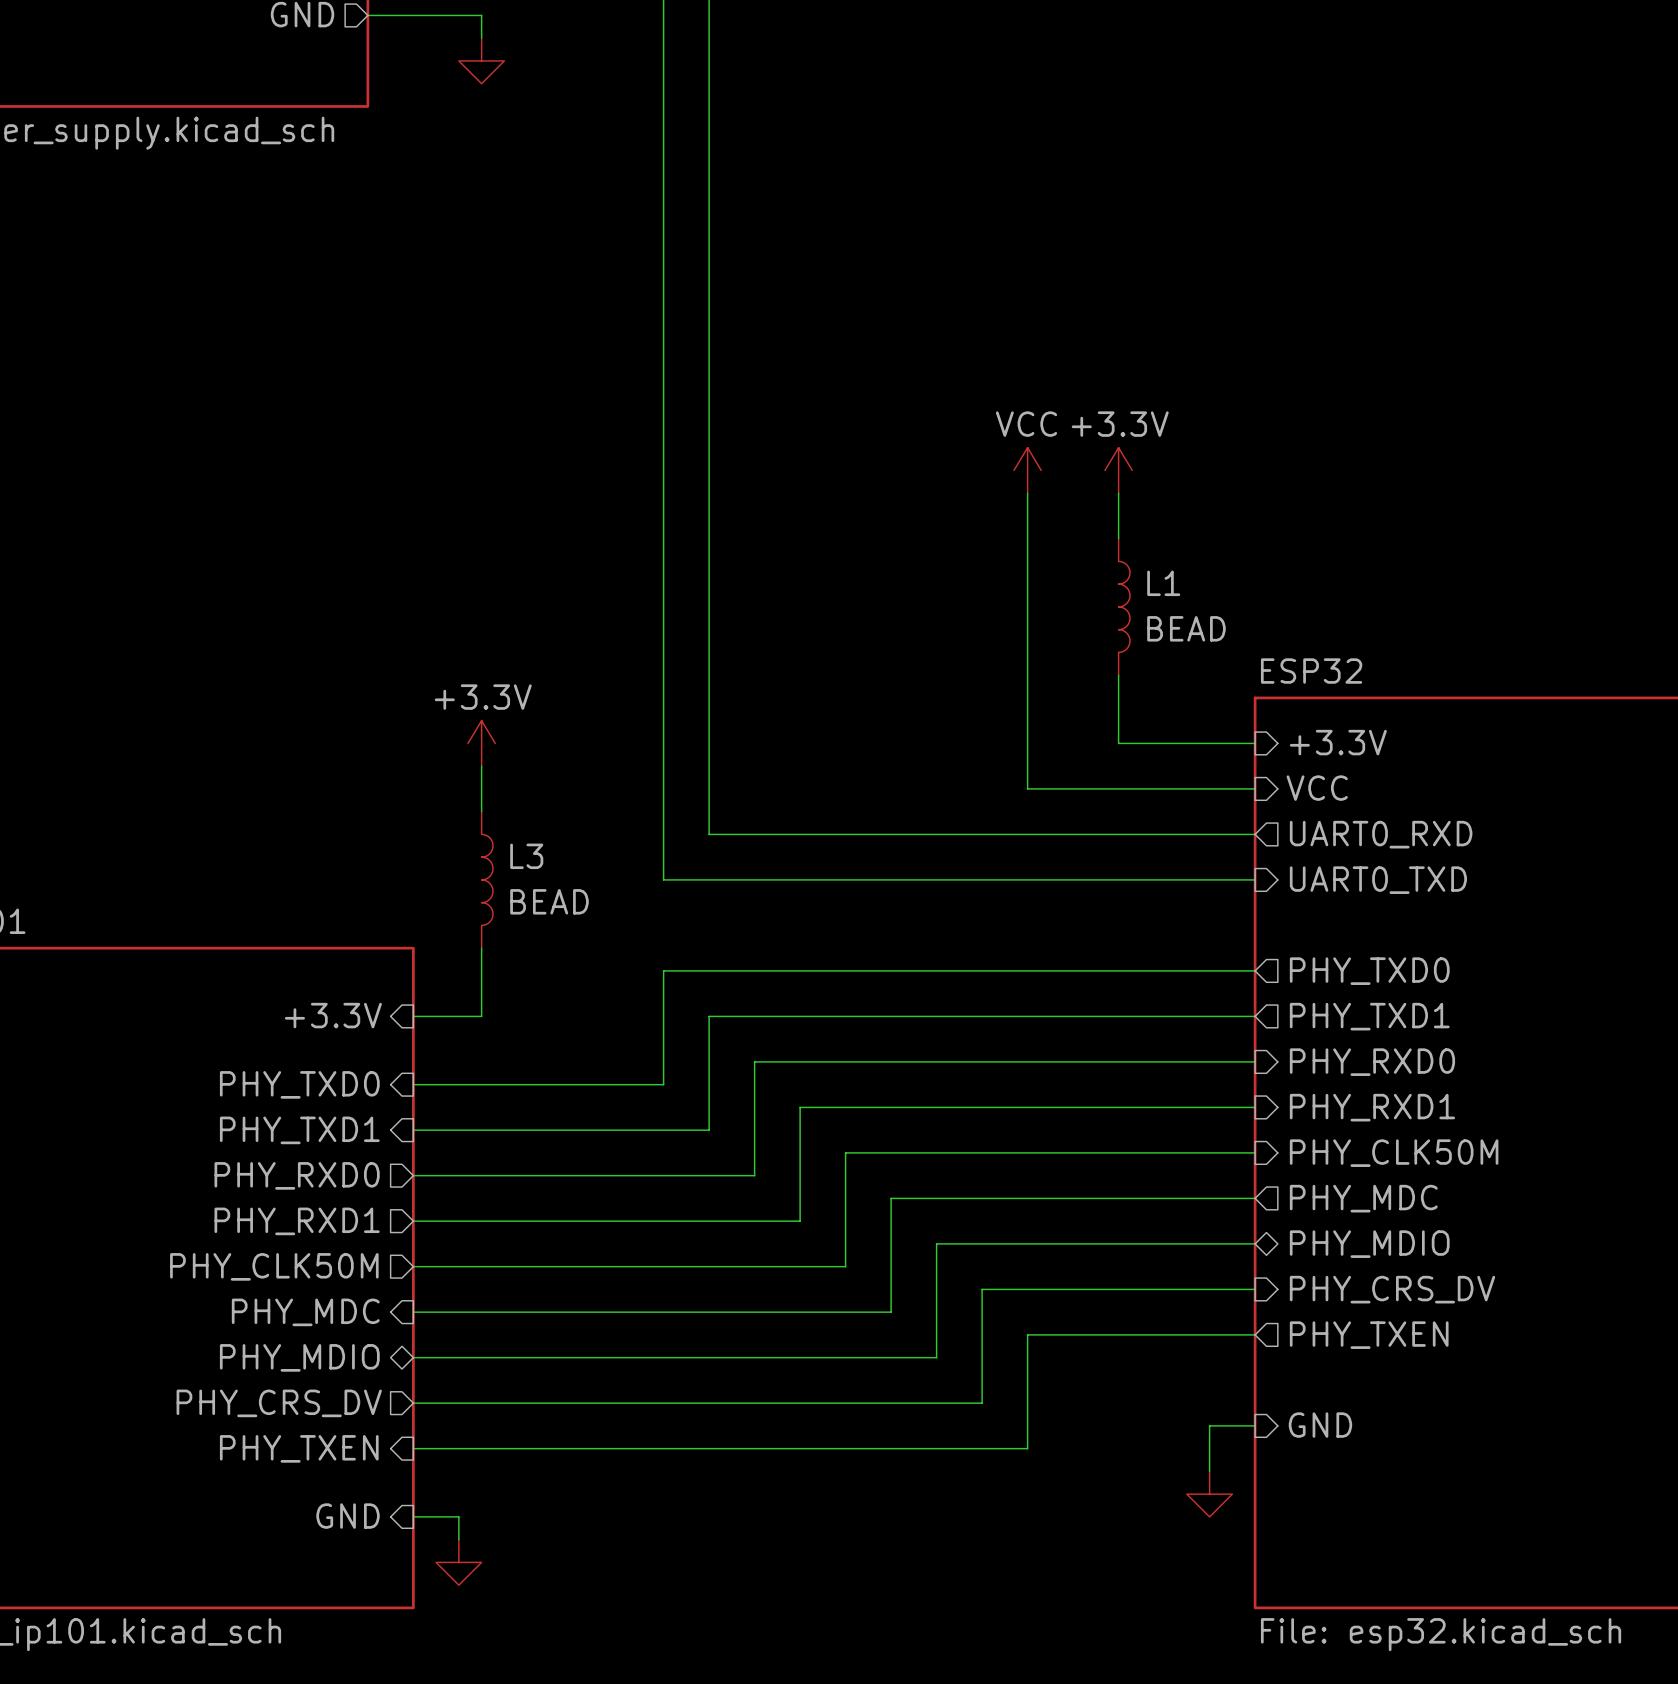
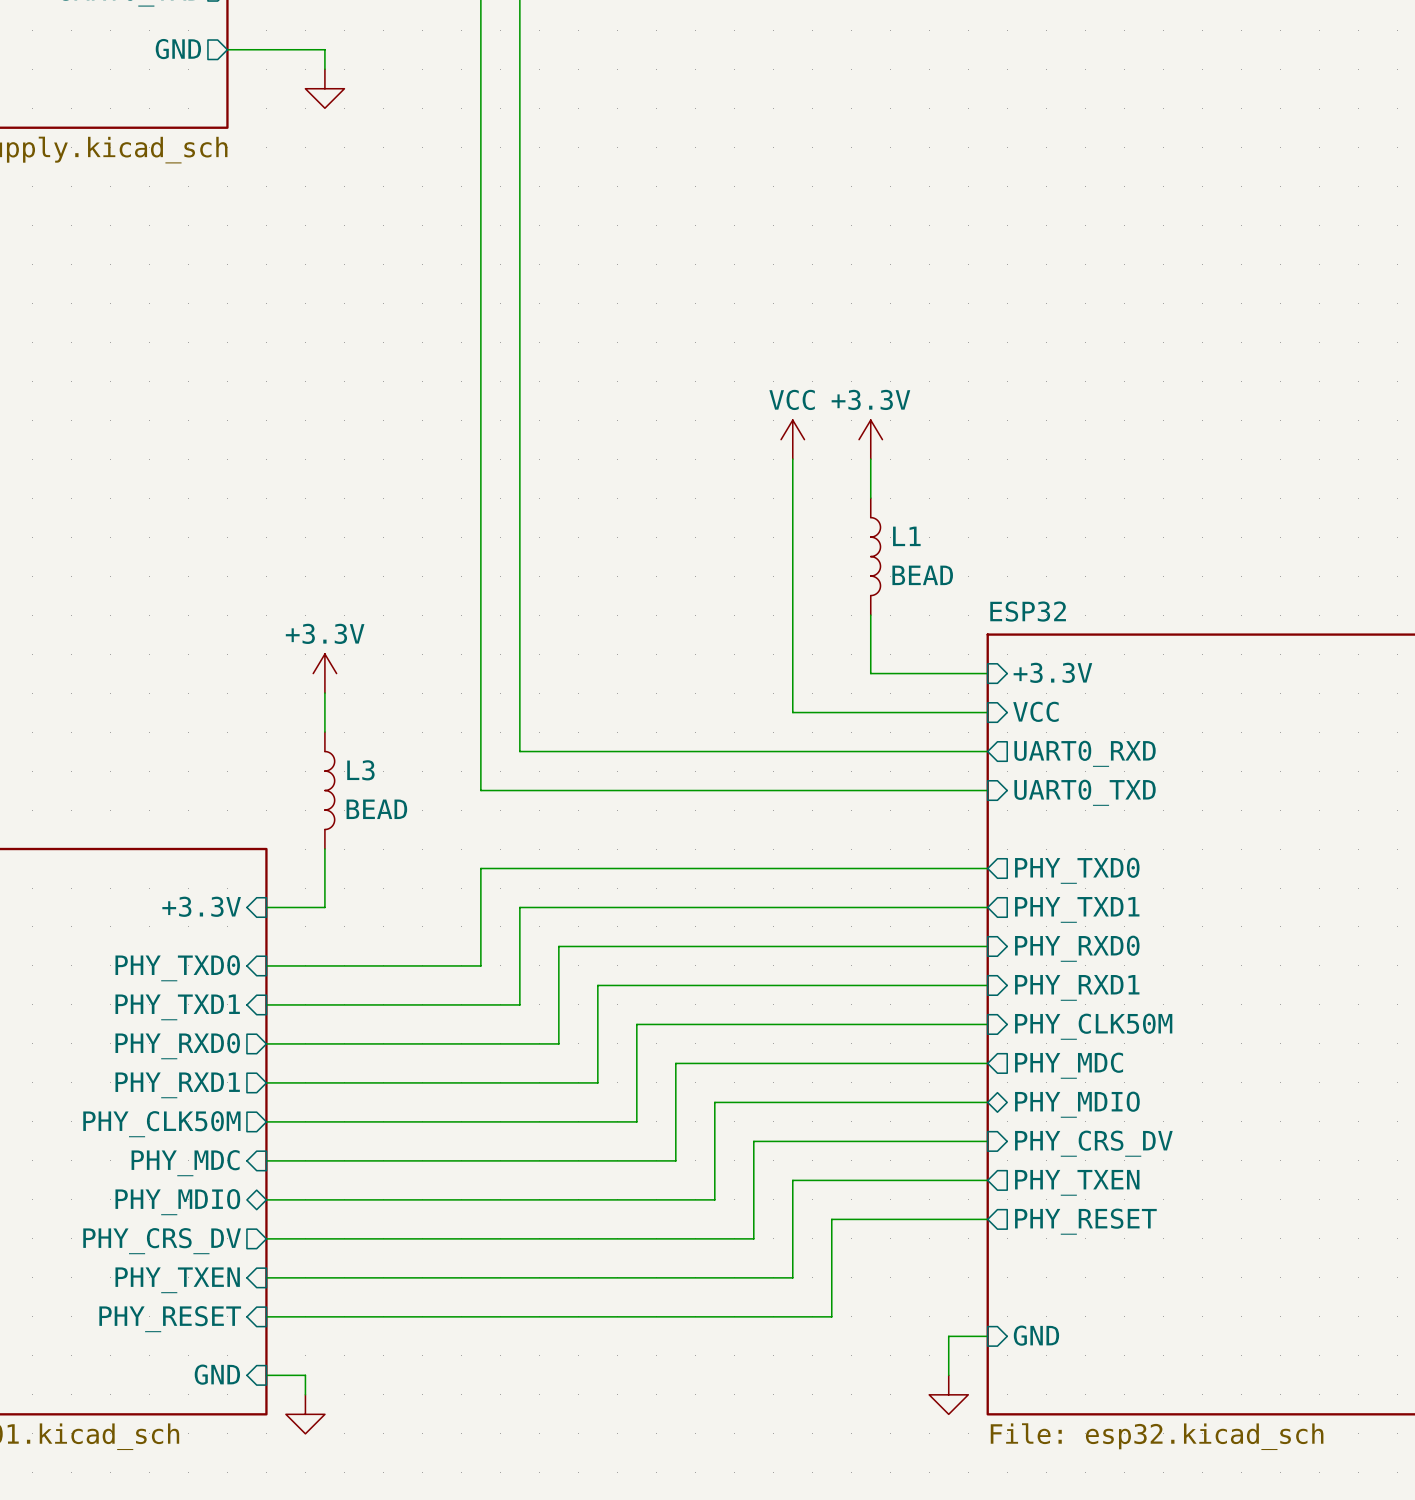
wire: none -> (987, 1219) (831, 1219) (831, 1316) (266, 1316)
sheet pin: none -> PHY_RESET (1085, 1221)
wire: (1255, 1425) (1209, 1425) (1209, 1471) -> (987, 1336) (948, 1336) (948, 1375)
sheet pin position: GND (1320, 1425) -> GND (1036, 1335)
sheet pin: none -> PHY_RESET (170, 1319)
power symbol position: (1209, 1494) -> (948, 1394)
sheet pin position: GND (348, 1516) -> GND (217, 1374)
wire: (413, 1516) (458, 1516) (458, 1539) -> (266, 1375) (305, 1375) (305, 1394)
power symbol position: (458, 1562) -> (305, 1414)

